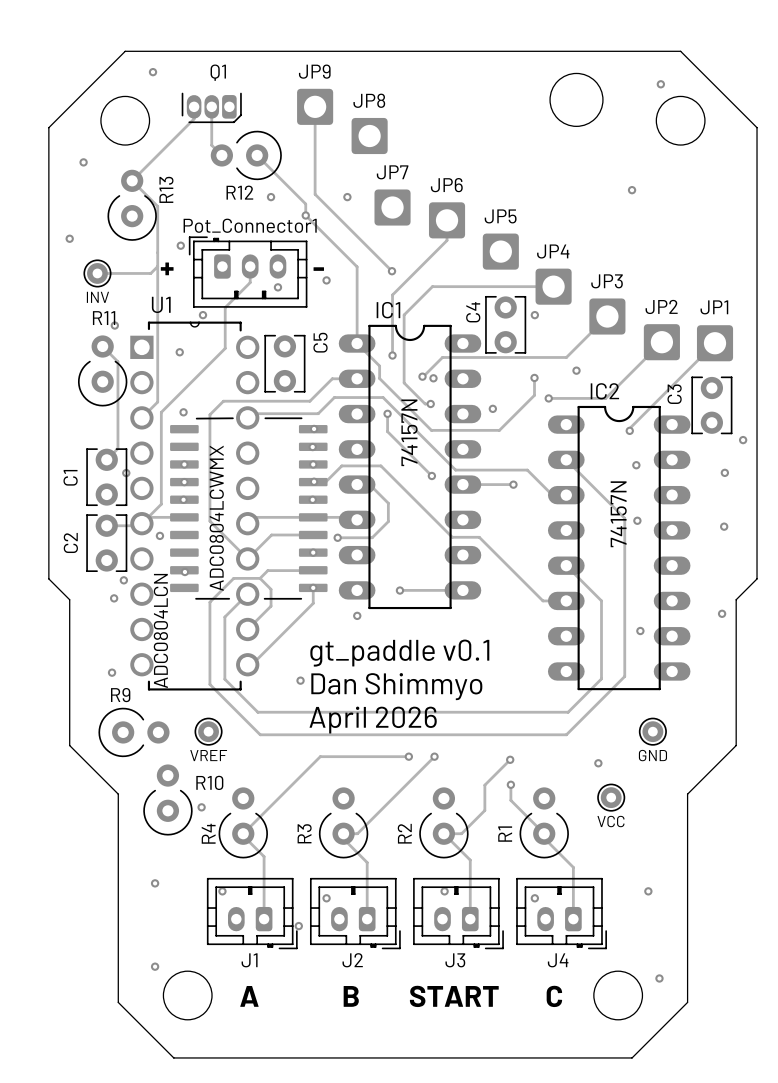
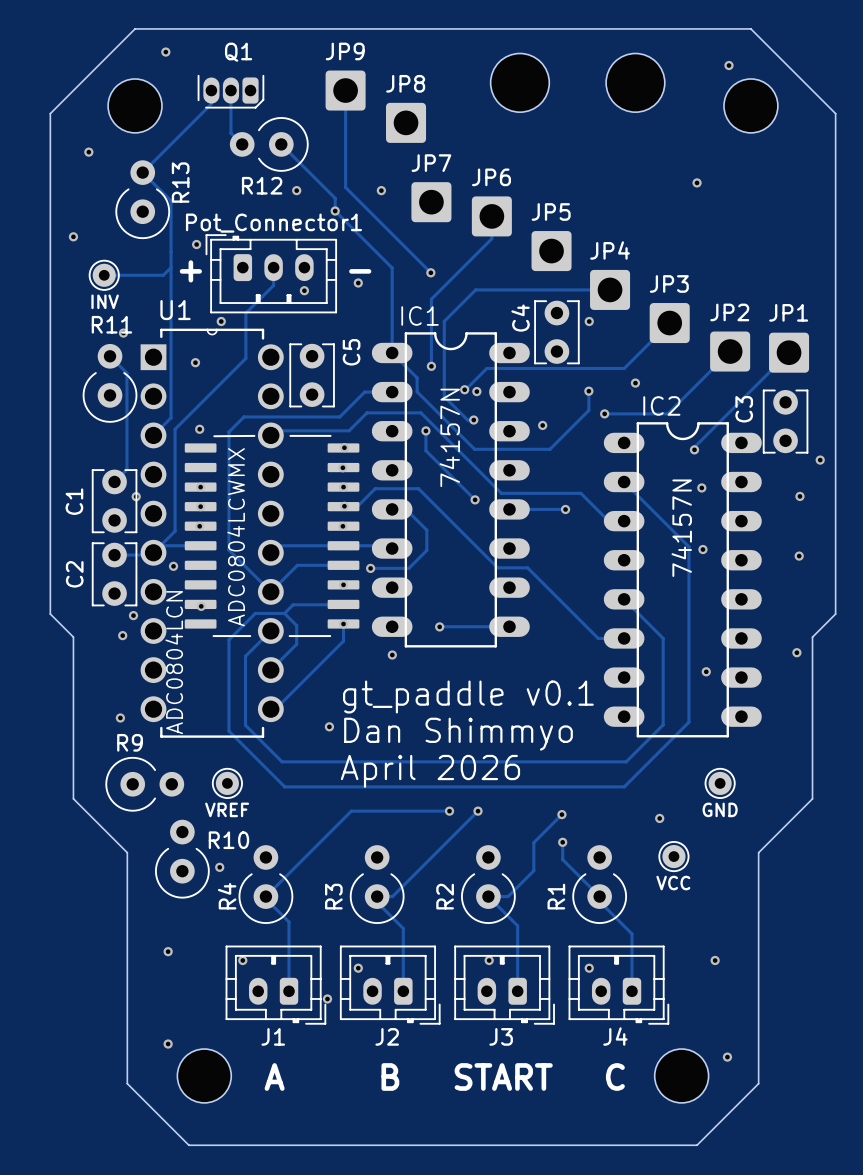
part: none -> (519, 82)

